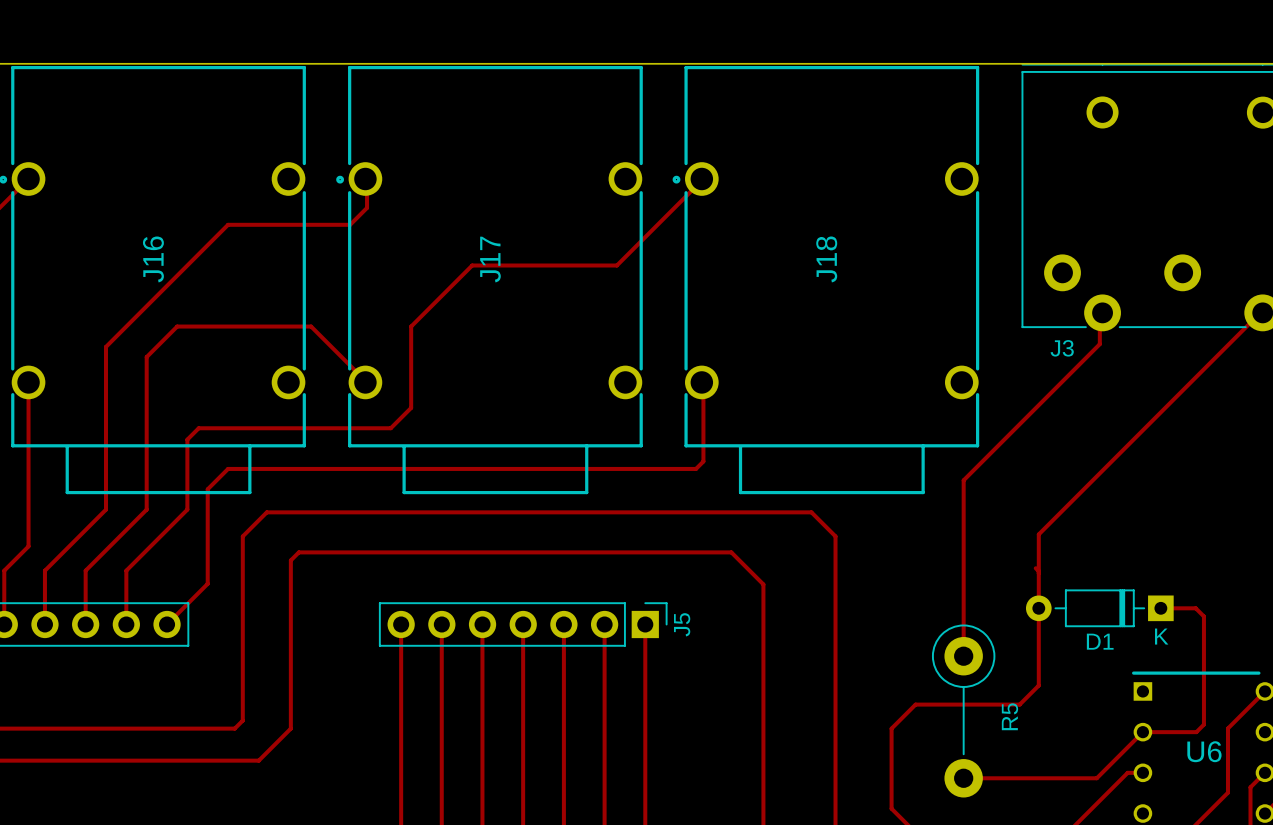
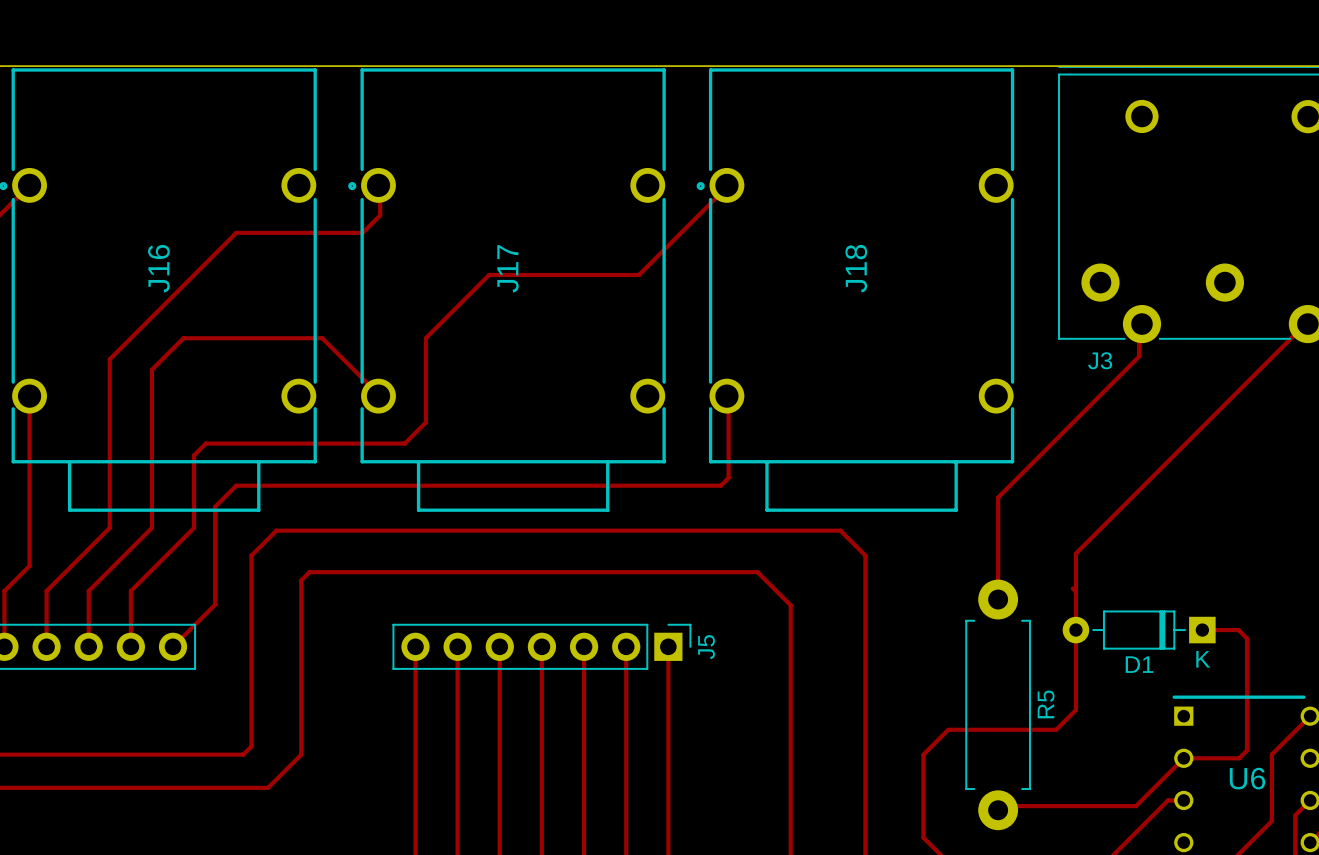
top track: (963, 578) (963, 656) -> none
R5 footprint: [931, 624, 996, 798] -> [965, 579, 1031, 831]

